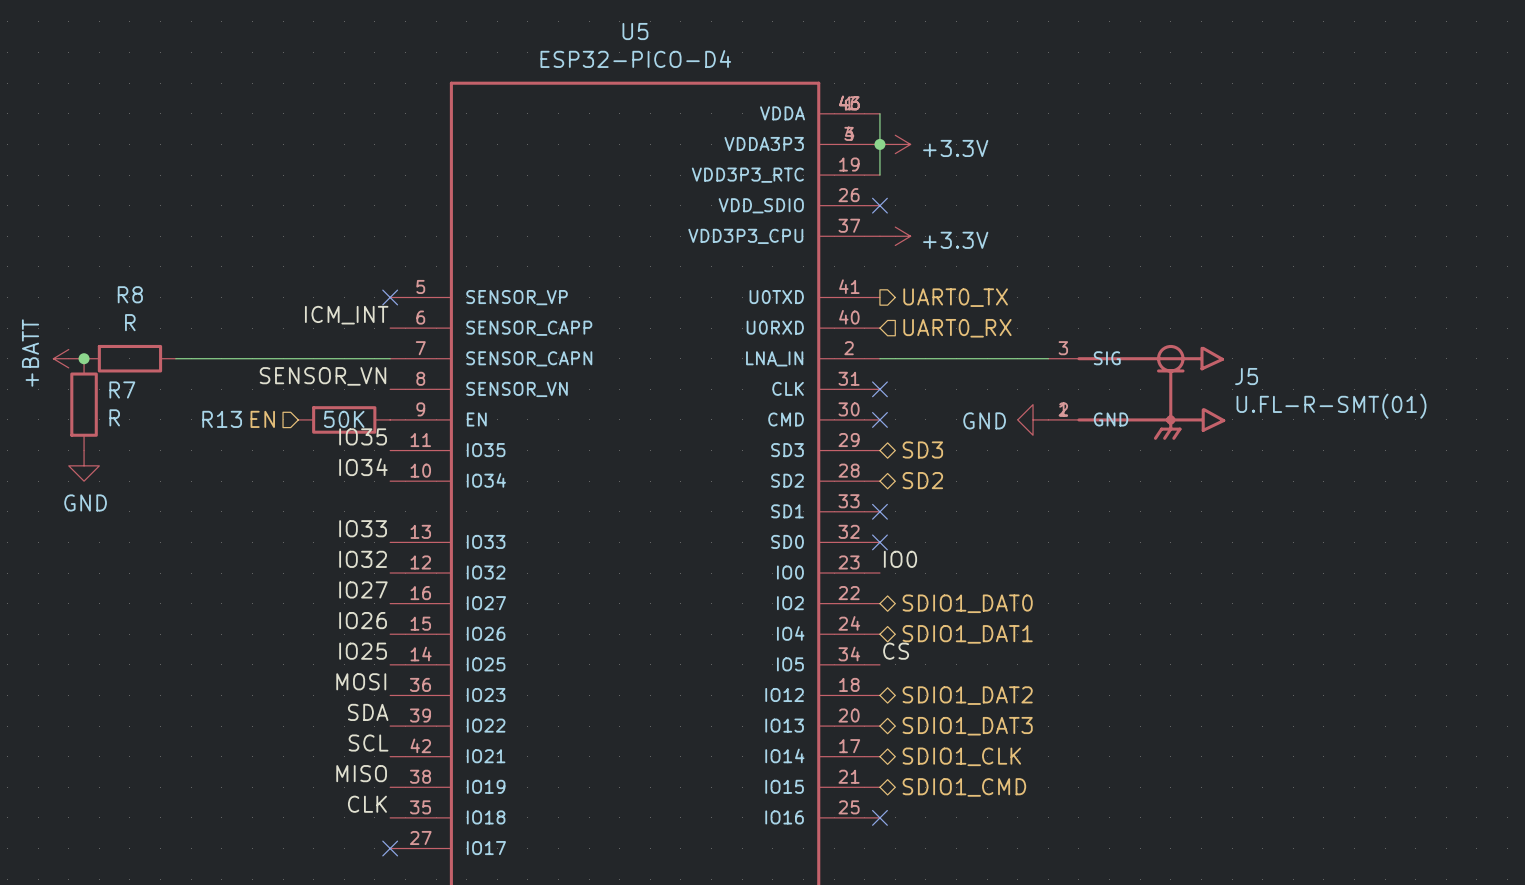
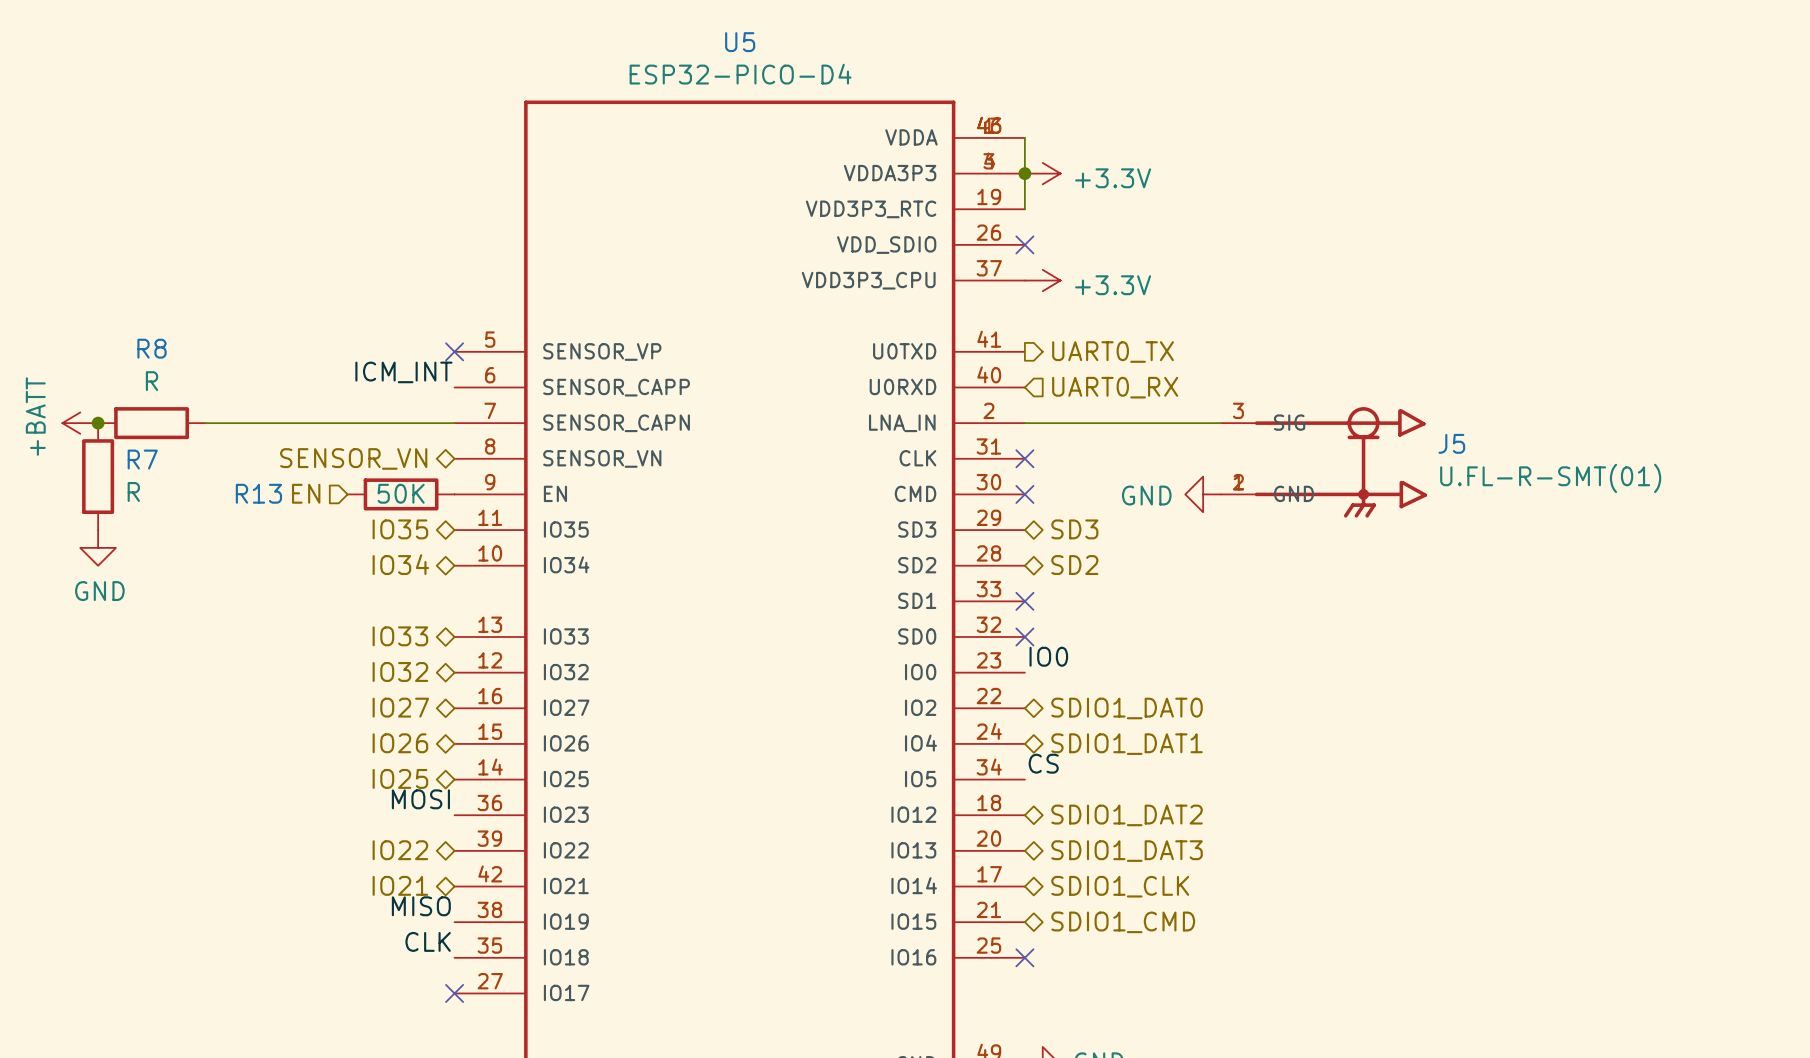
label: SENSOR_VN (323, 376) -> none
hierarchical label: none -> SENSOR_VN (353, 458)
label: IO35 (363, 436) -> none
hierarchical label: none -> IO35 (400, 529)
label: IO34 (363, 467) -> none
hierarchical label: none -> IO34 (400, 564)
label: IO33 (363, 528) -> none
hierarchical label: none -> IO33 (400, 636)
label: IO32 (363, 559) -> none
hierarchical label: none -> IO32 (400, 671)
label: IO27 (363, 589) -> none
hierarchical label: none -> IO27 (400, 707)
label: IO26 (363, 620) -> none
hierarchical label: none -> IO26 (400, 743)
label: IO25 (363, 651) -> none
hierarchical label: none -> IO25 (400, 778)
label: SDA (368, 712) -> none
hierarchical label: none -> IO22 (400, 850)
label: SCL (368, 743) -> none
hierarchical label: none -> IO21 (400, 885)

